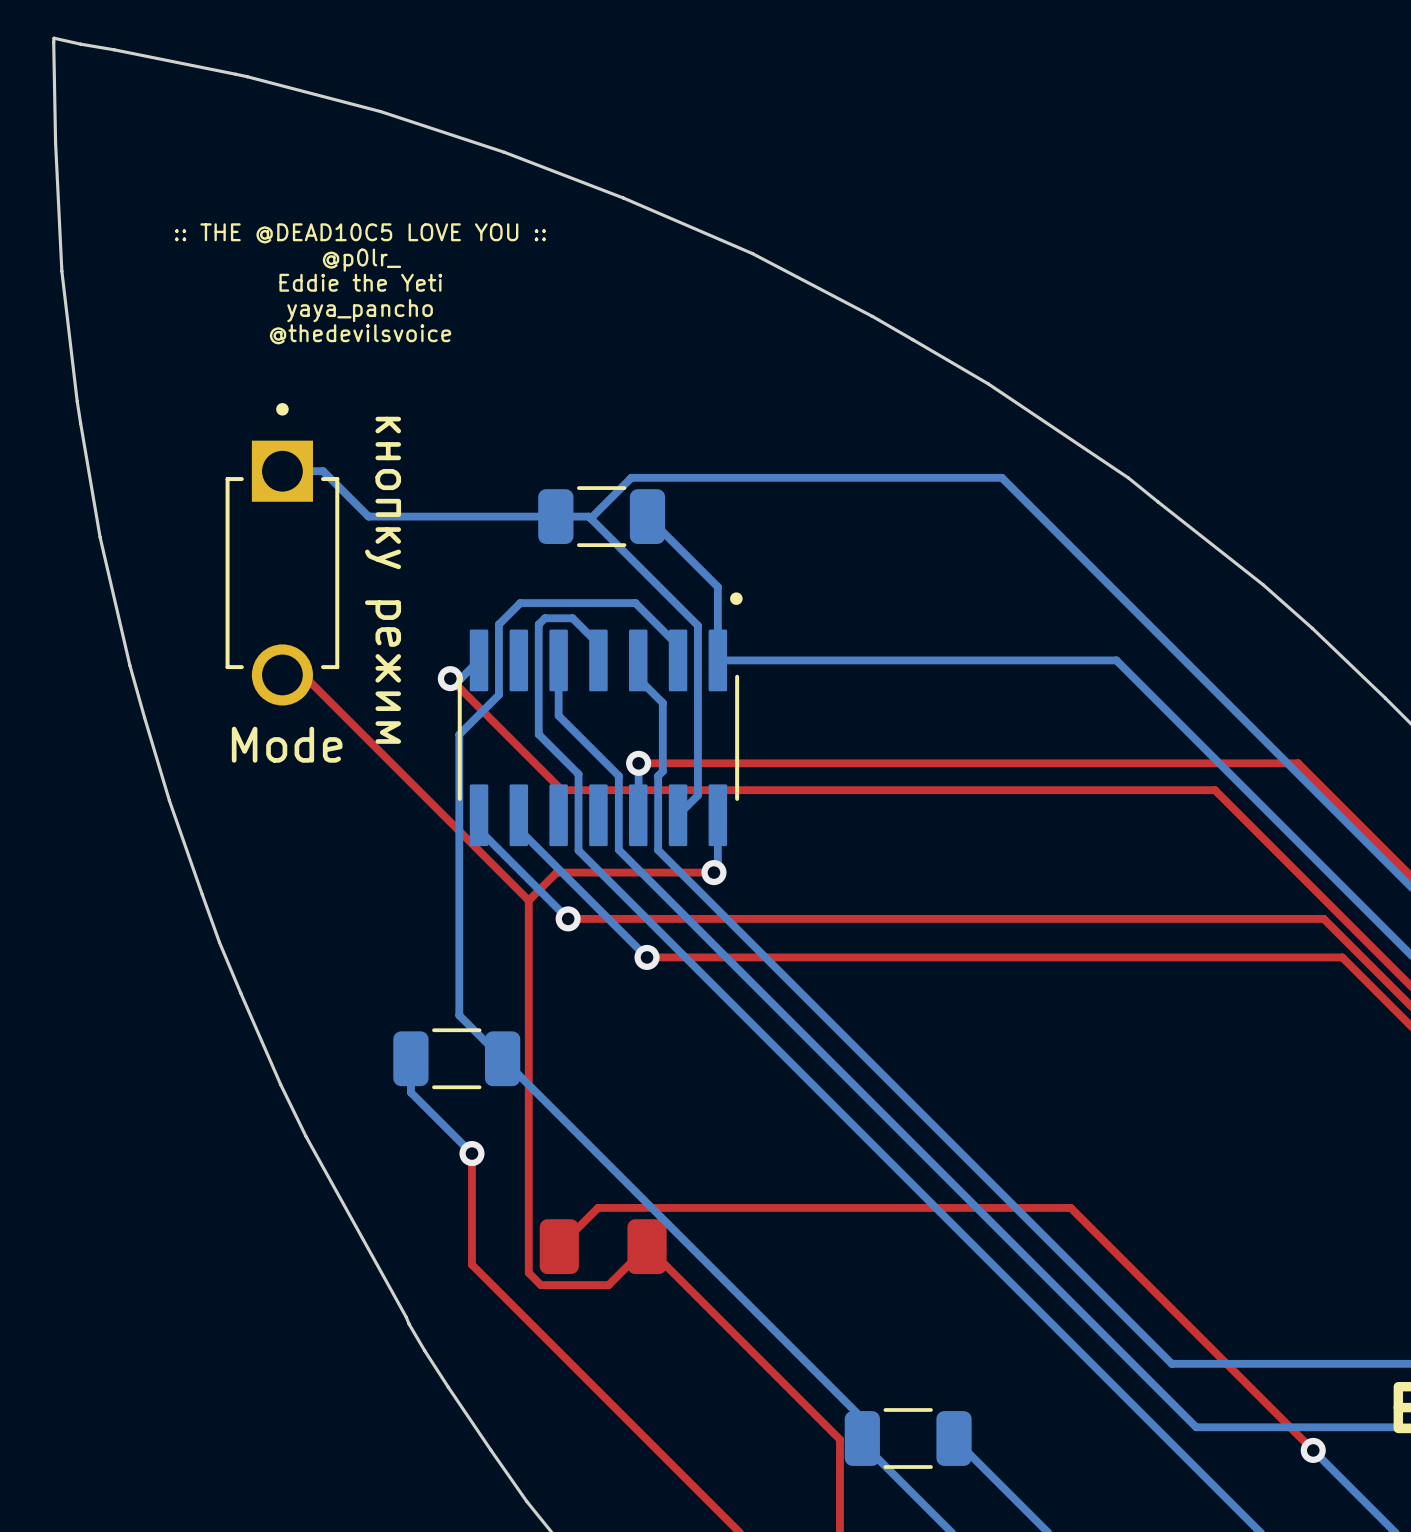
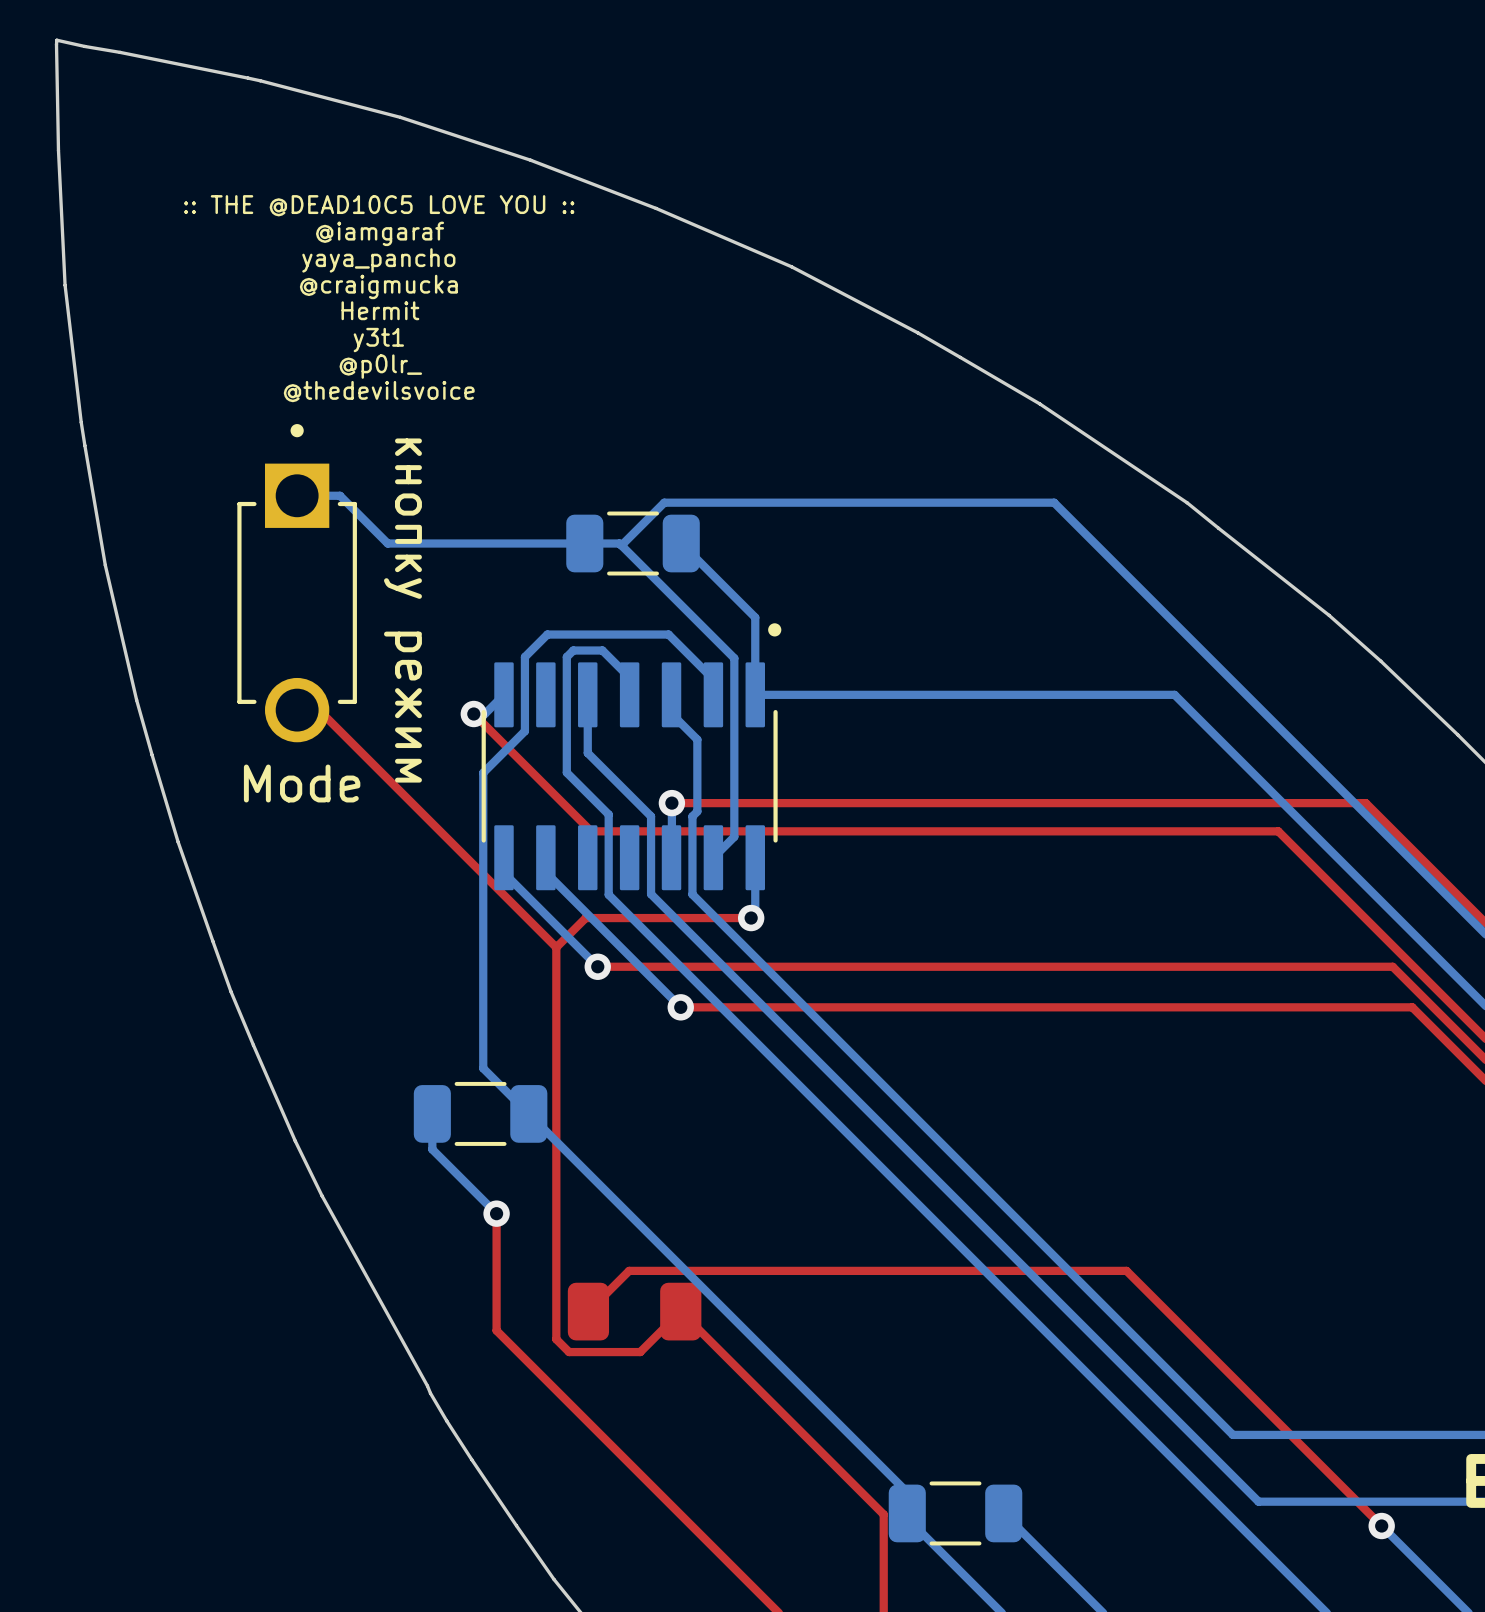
text: none -> @iamgaraf (380, 233)
text position: :: THE @DEAD10C5 LOVE YOU :: (360, 233) -> :: THE @DEAD10C5 LOVE YOU :: (379, 205)
text position: @p0lr_ (361, 260) -> @p0lr_ (380, 366)
text: none -> @craigmucka (378, 286)
text: Eddie the Yeti (360, 282) -> none
text: none -> Hermit (380, 310)
text position: yaya_pancho (360, 310) -> yaya_pancho (378, 260)
text: none -> y3t1 (378, 340)
text position: @thedevilsvoice (360, 334) -> @thedevilsvoice (379, 391)

